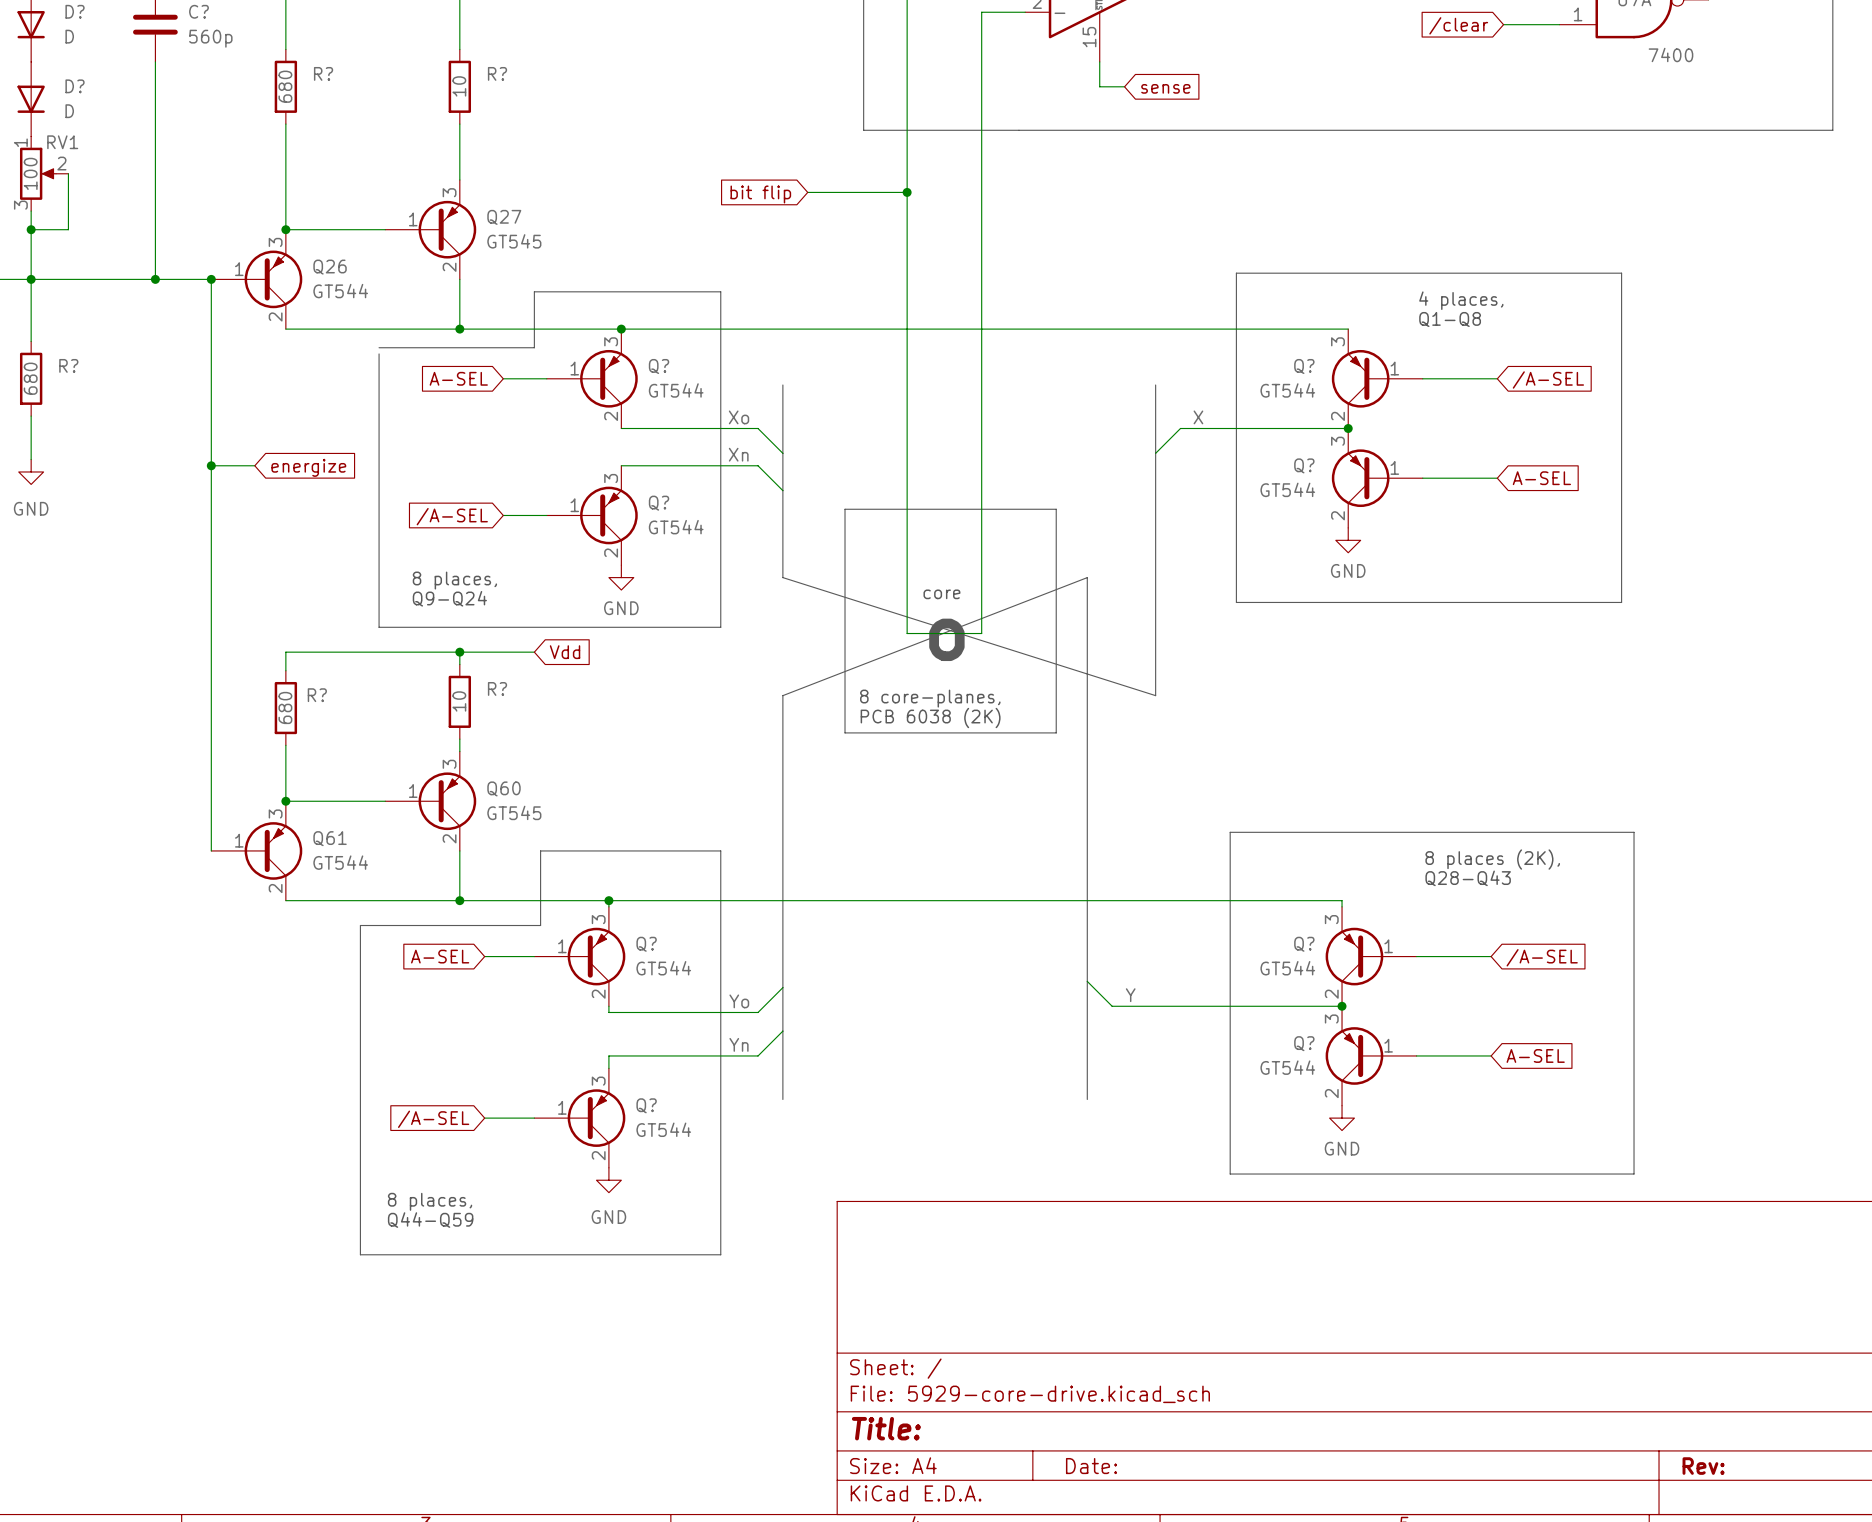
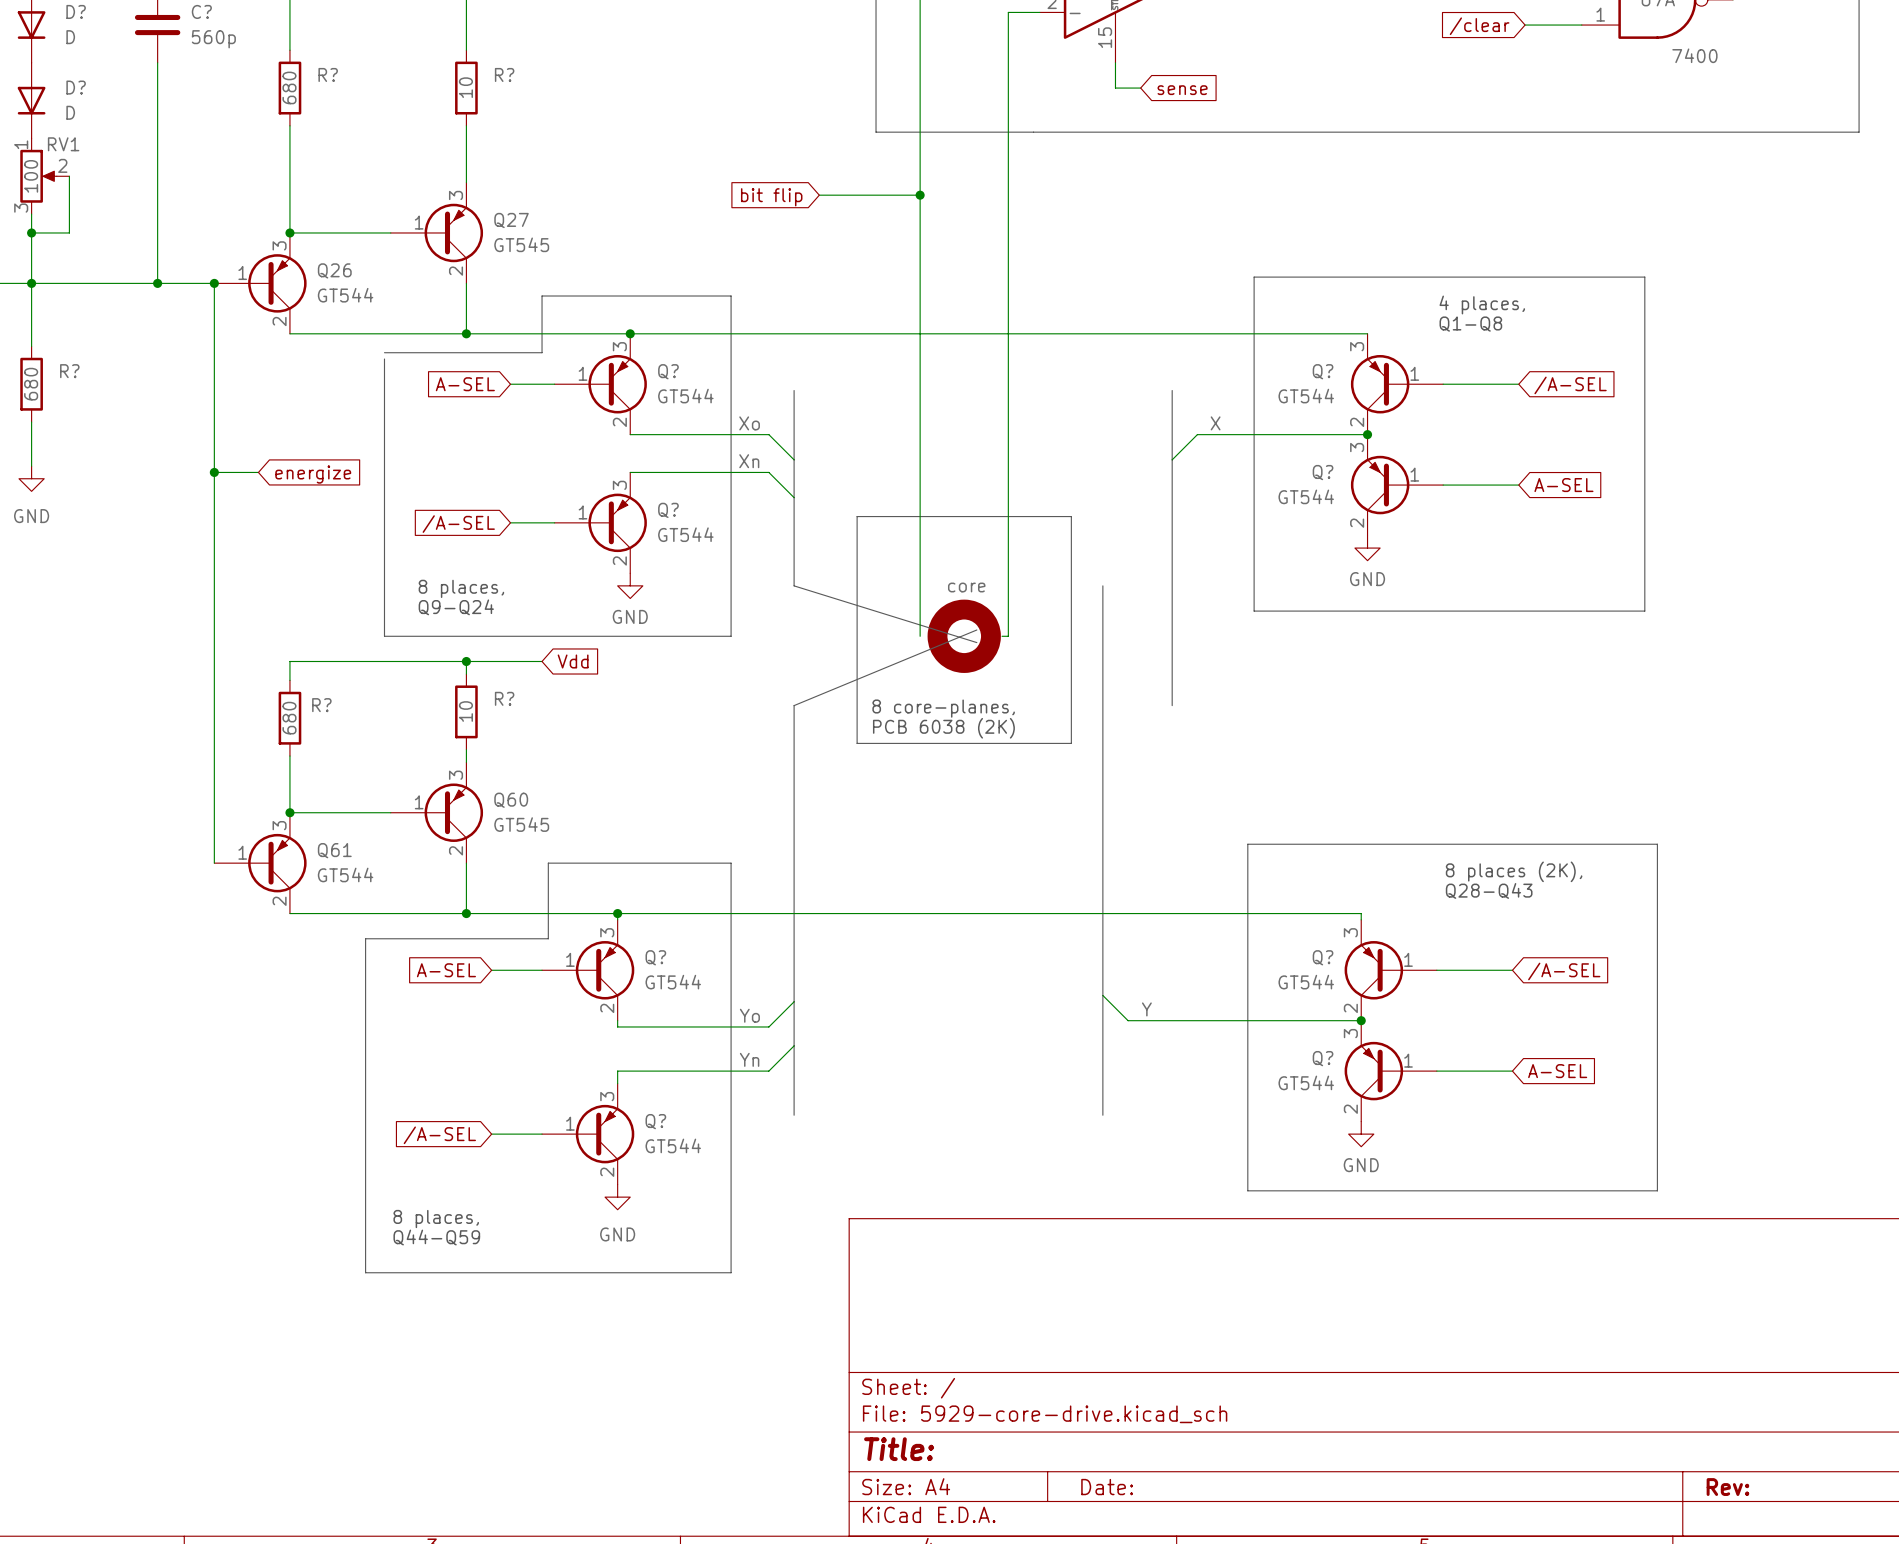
wire: (994, 12) (981, 12) (981, 633) (907, 633) (907, 627) -> (1008, 12) (1008, 636) (1002, 636)
bus: (782, 577) (1155, 695) -> (794, 585) (976, 642)
bus: (1087, 577) (782, 695) -> (976, 629) (794, 705)
text: core (941, 594) -> none
part: none -> core (964, 636)
text: o (946, 639) -> none

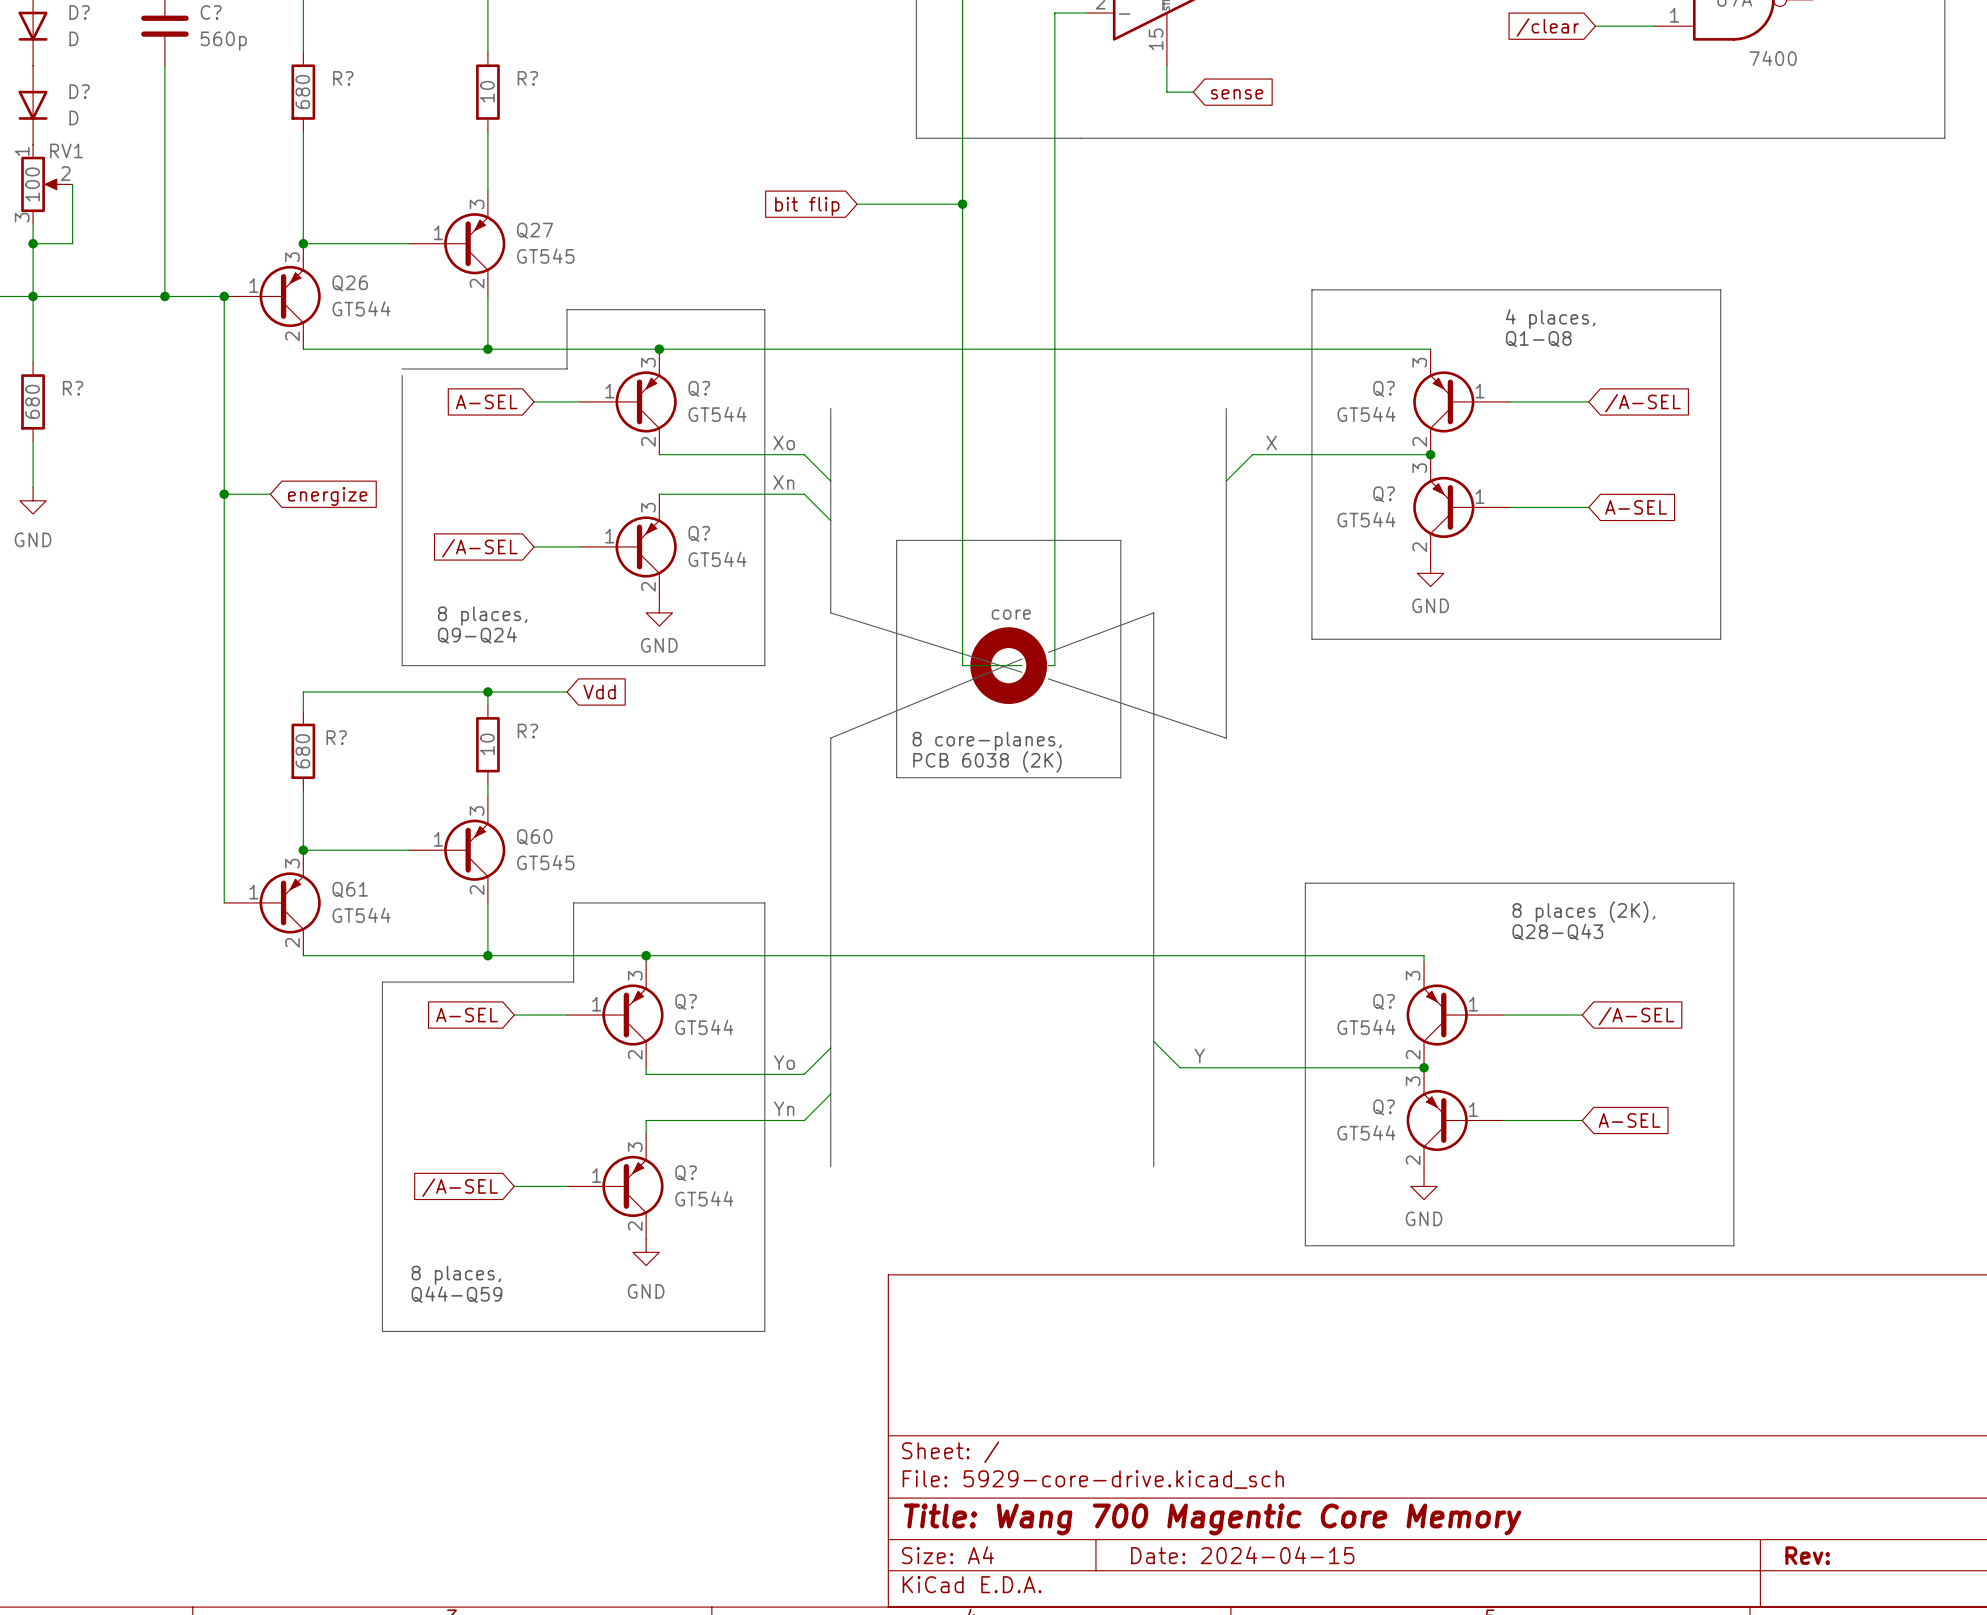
bus: none -> (1153, 612) (1048, 652)
wire: none -> (962, 665) (1021, 665)
bus: none -> (1048, 678) (1226, 738)
title block: Title: (899, 1449) -> Title: Wang 700 Magentic Core Memory (1212, 1519)
title block: Date: (1107, 1487) -> Date: 2024-04-15 (1242, 1555)

